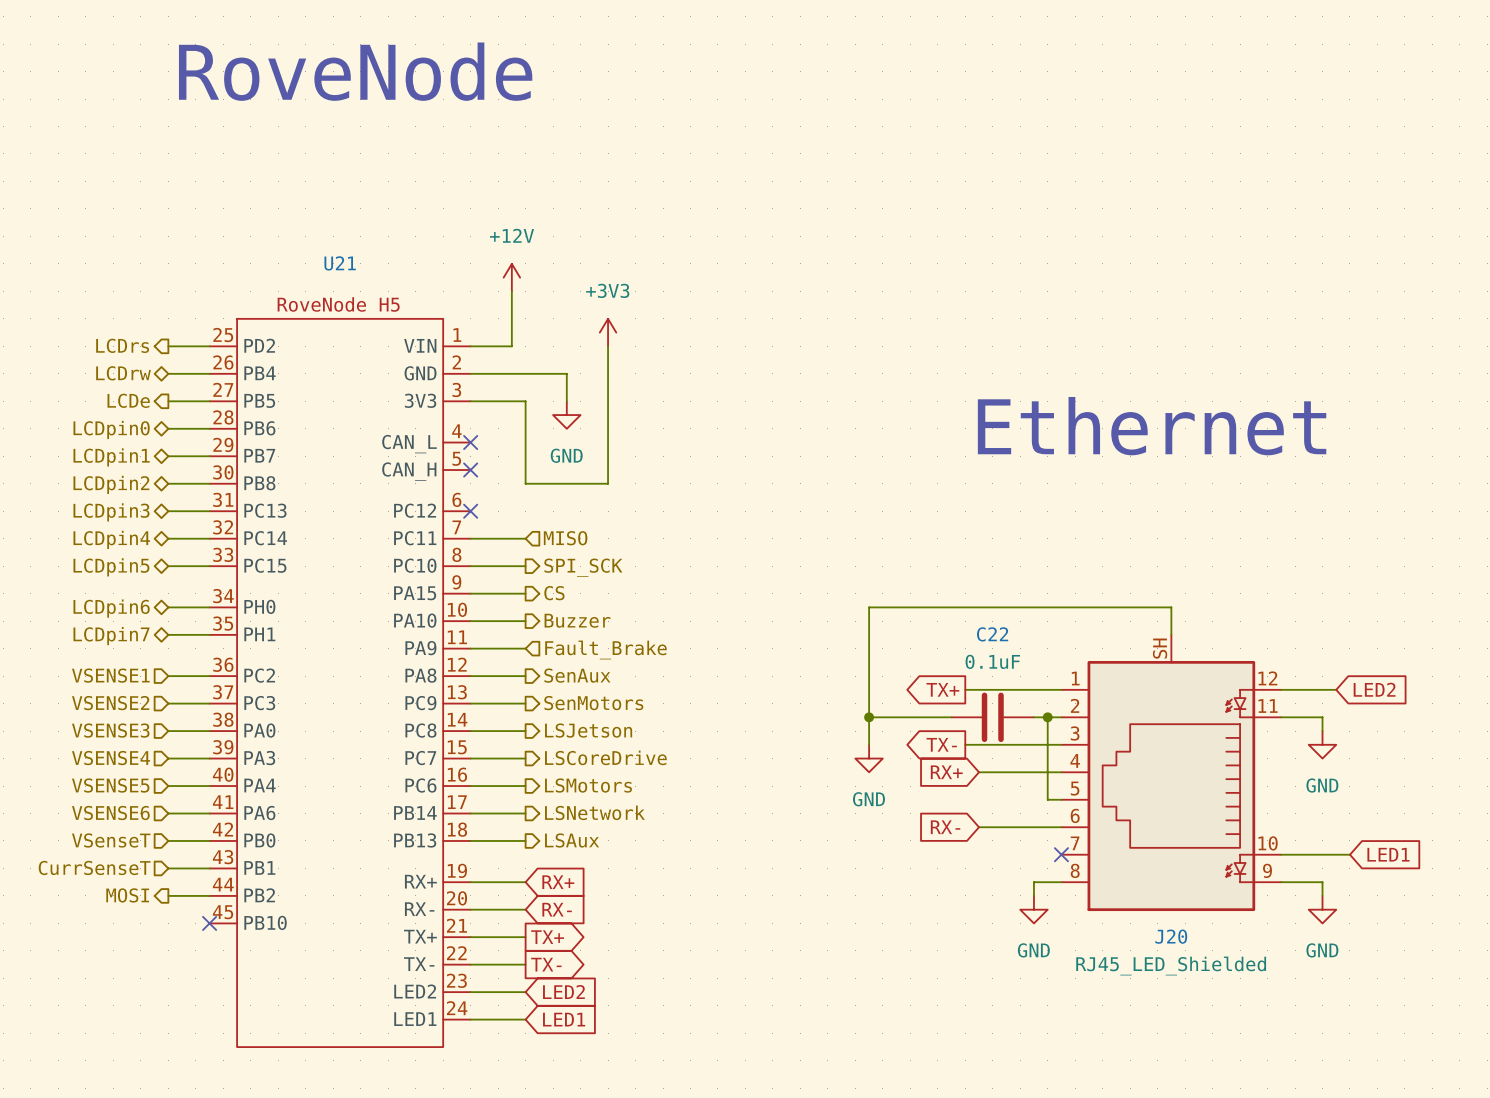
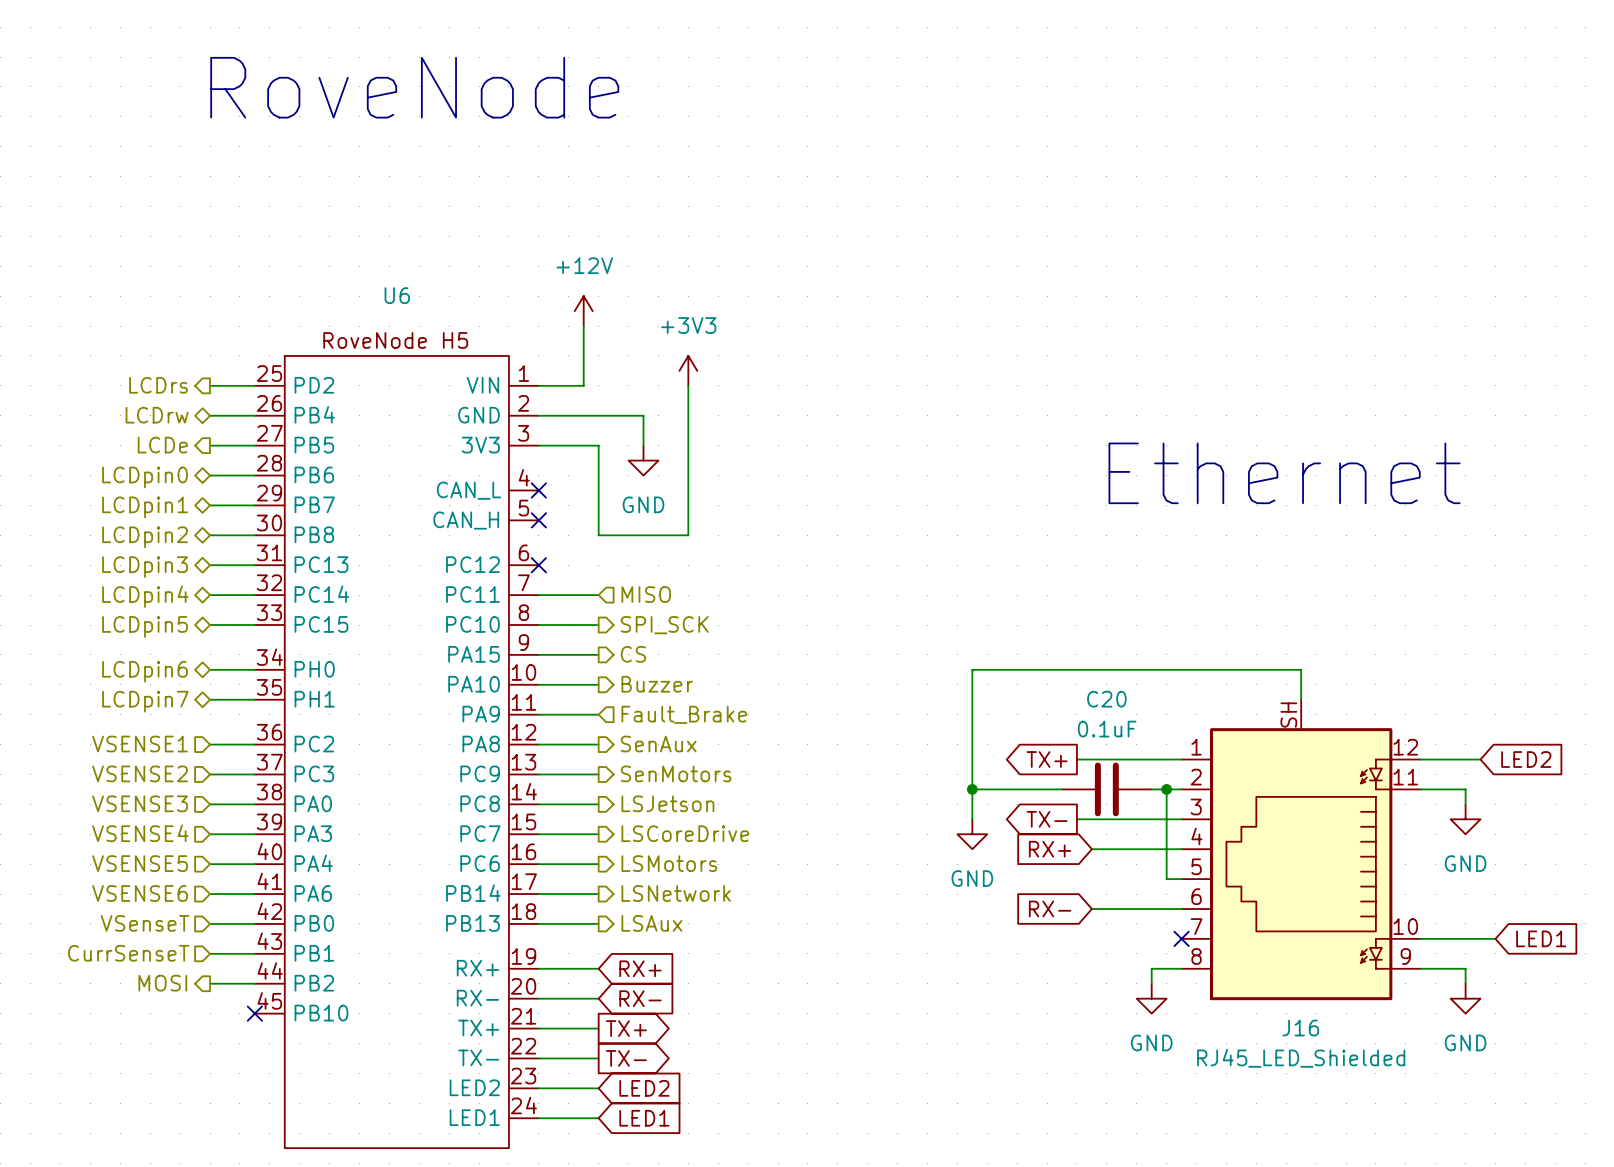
U21 name: U21 (340, 263) -> U6 (397, 295)
C22 name: C22 (992, 634) -> C20 (1106, 699)
J20 name: J20 (1171, 936) -> J16 (1300, 1028)

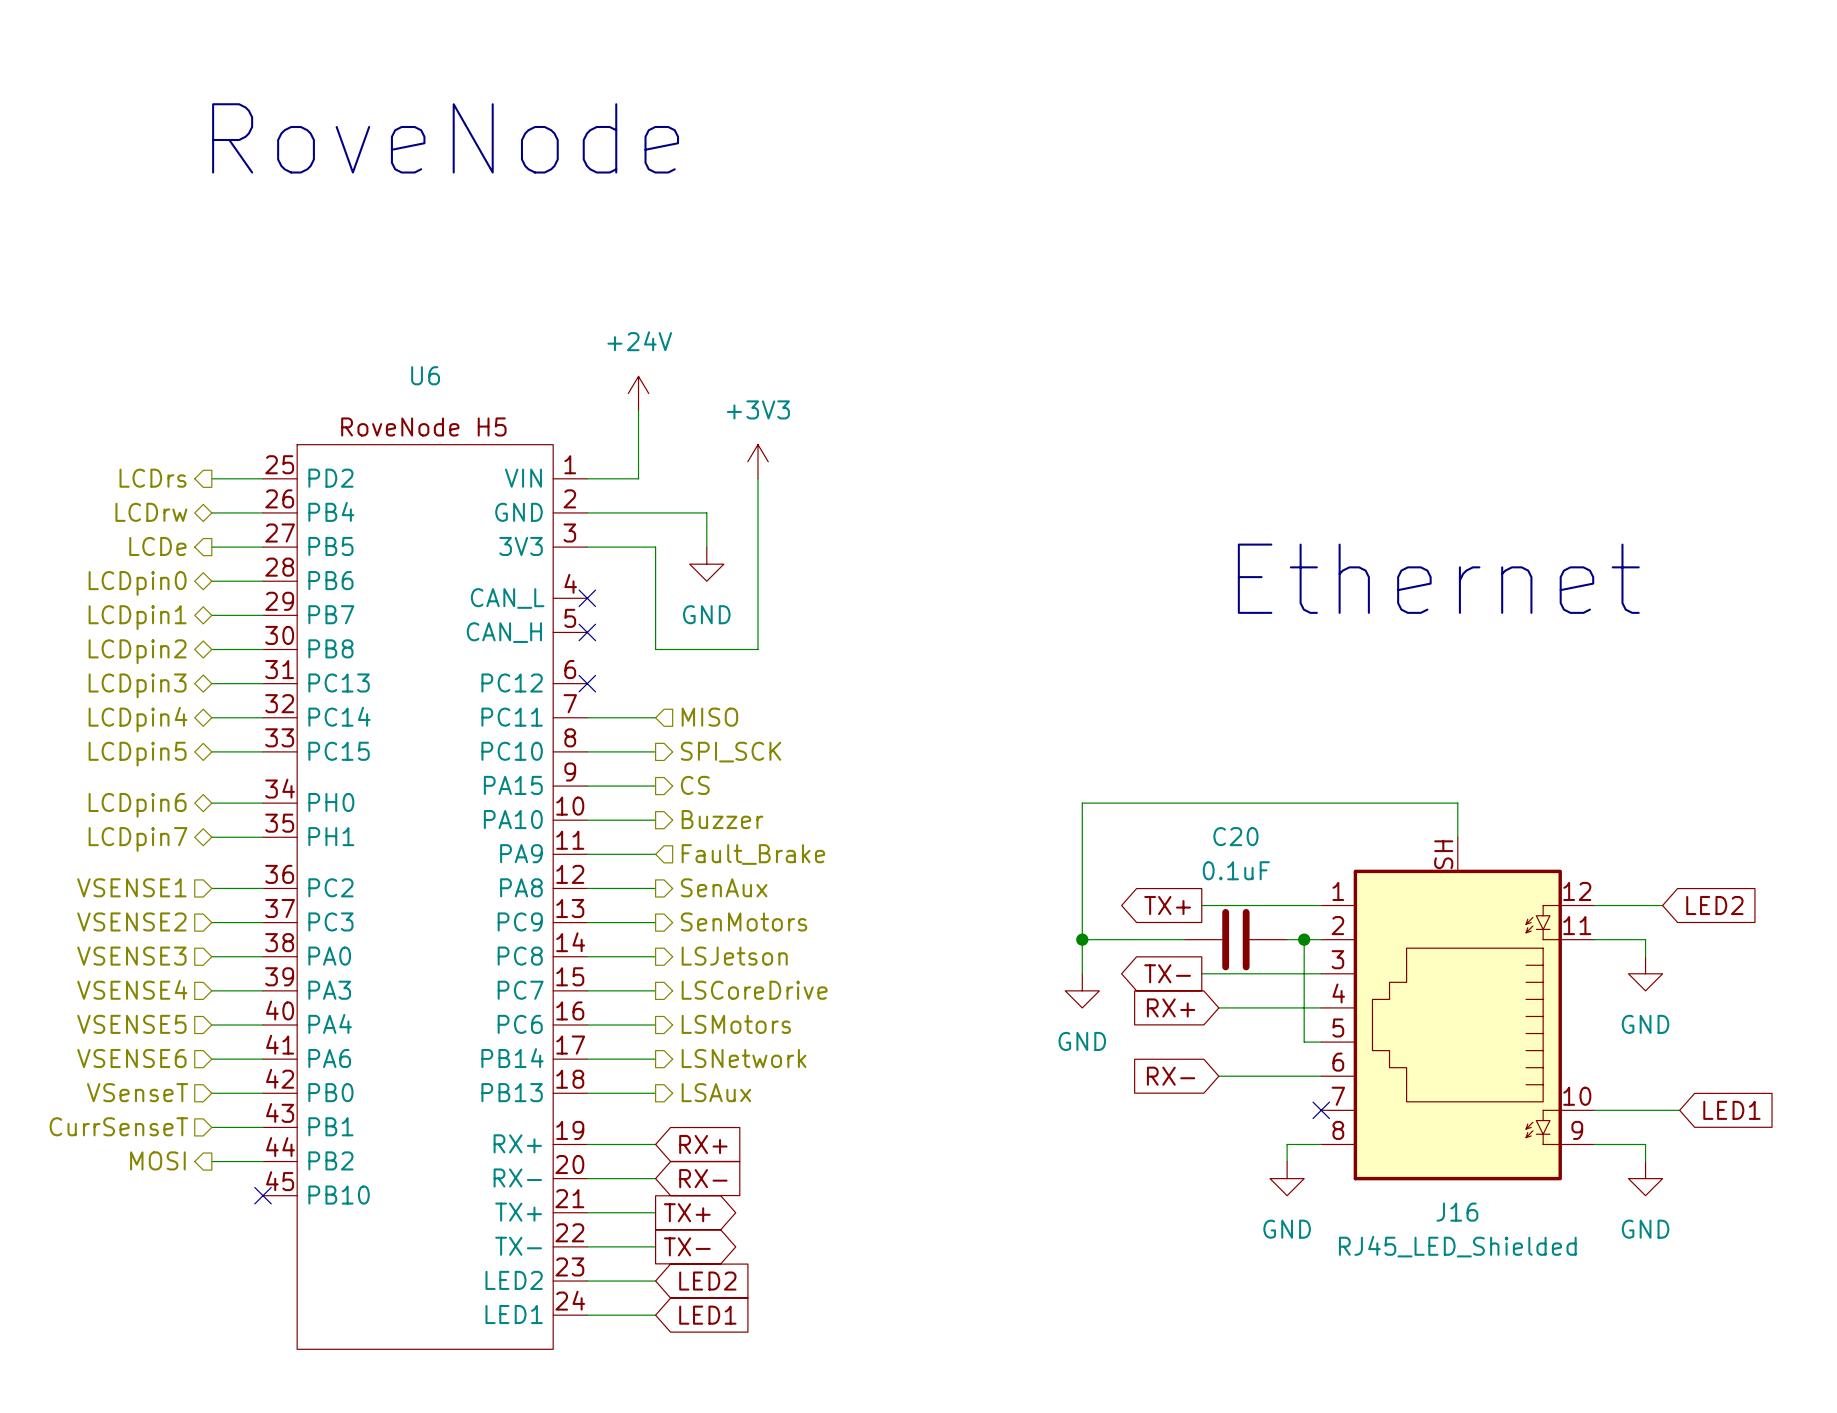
power symbol: +12V (583, 311) -> +24V (638, 393)

